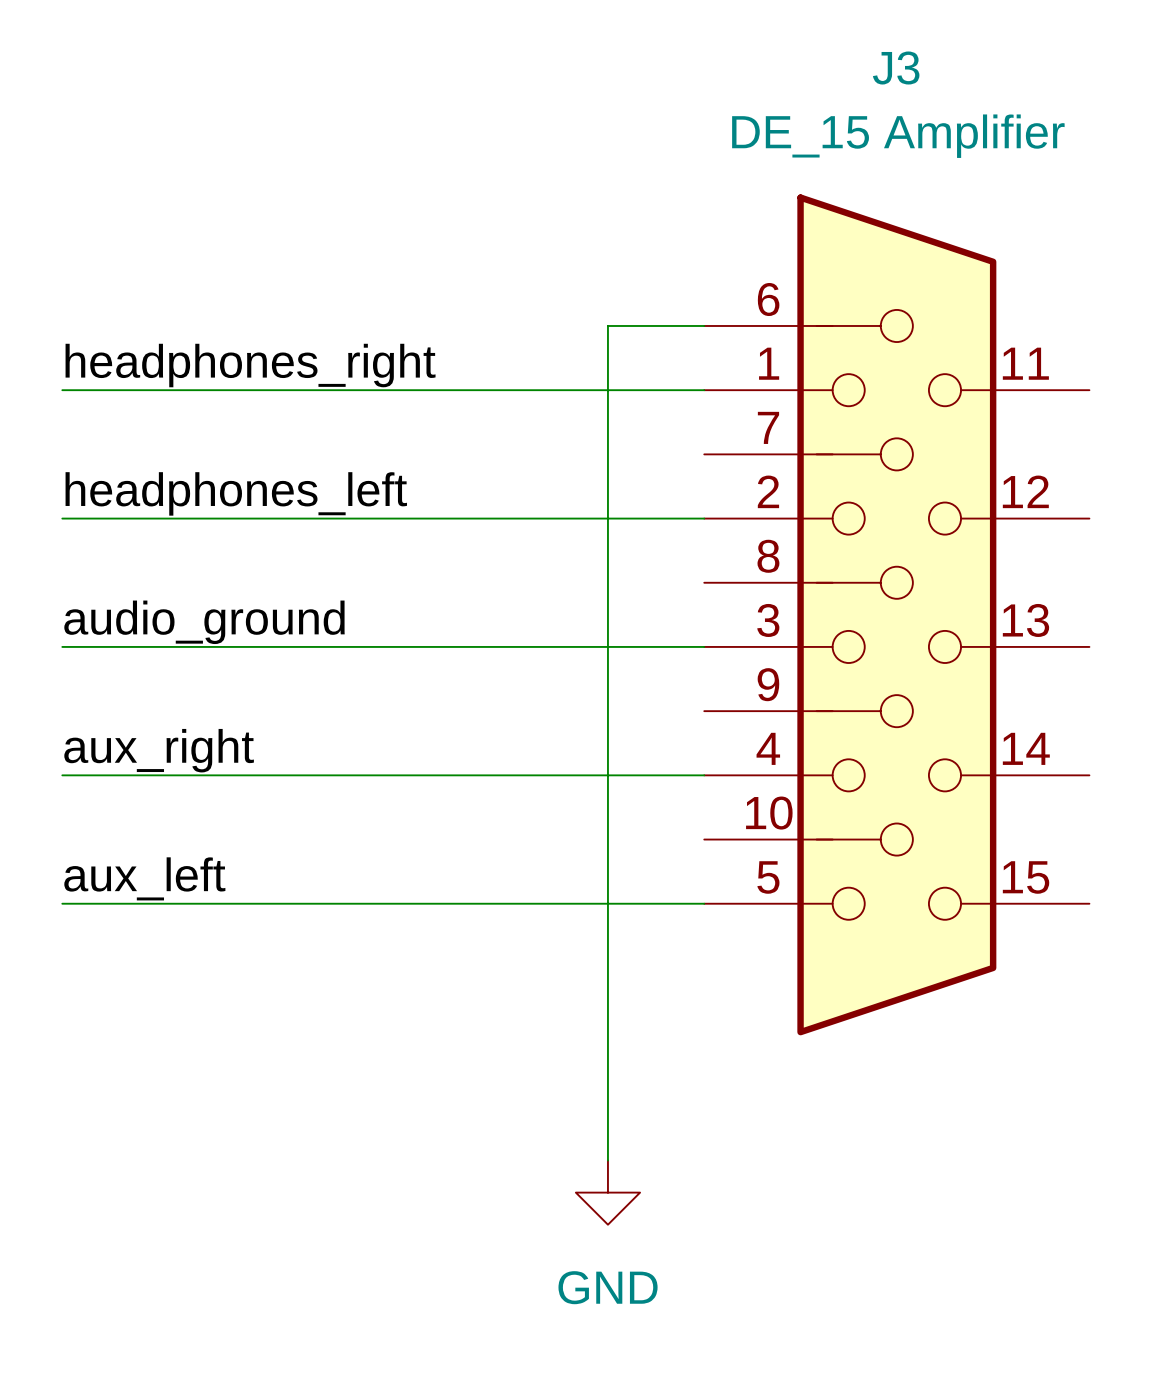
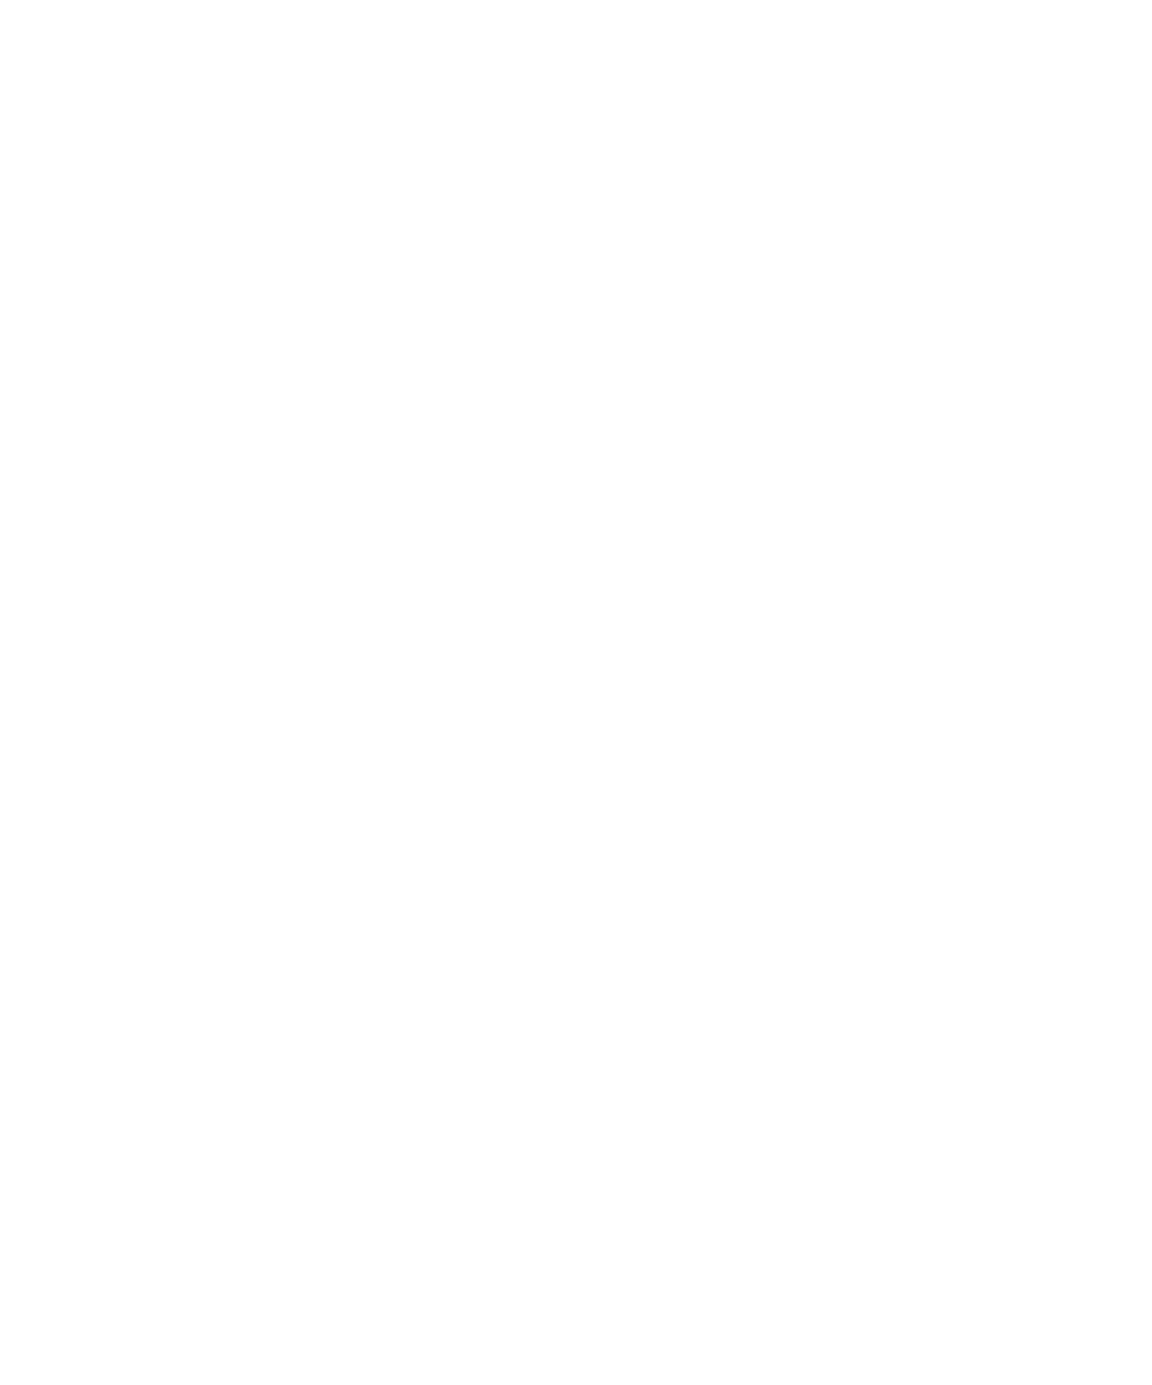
wire: (704, 325) (607, 325) (607, 1160) -> none
label: headphones_right (250, 365) -> none
wire: (62, 390) (704, 390) -> none
label: headphones_left (236, 493) -> none
wire: (62, 518) (704, 518) -> none
J3: DE_15 Amplifier (896, 614) -> none
label: audio_ground (204, 622) -> none
wire: (62, 646) (704, 646) -> none
label: aux_right (159, 750) -> none
wire: (62, 775) (704, 775) -> none
label: aux_left (144, 878) -> none
wire: (62, 903) (704, 903) -> none
power symbol: GND (607, 1192) -> none

